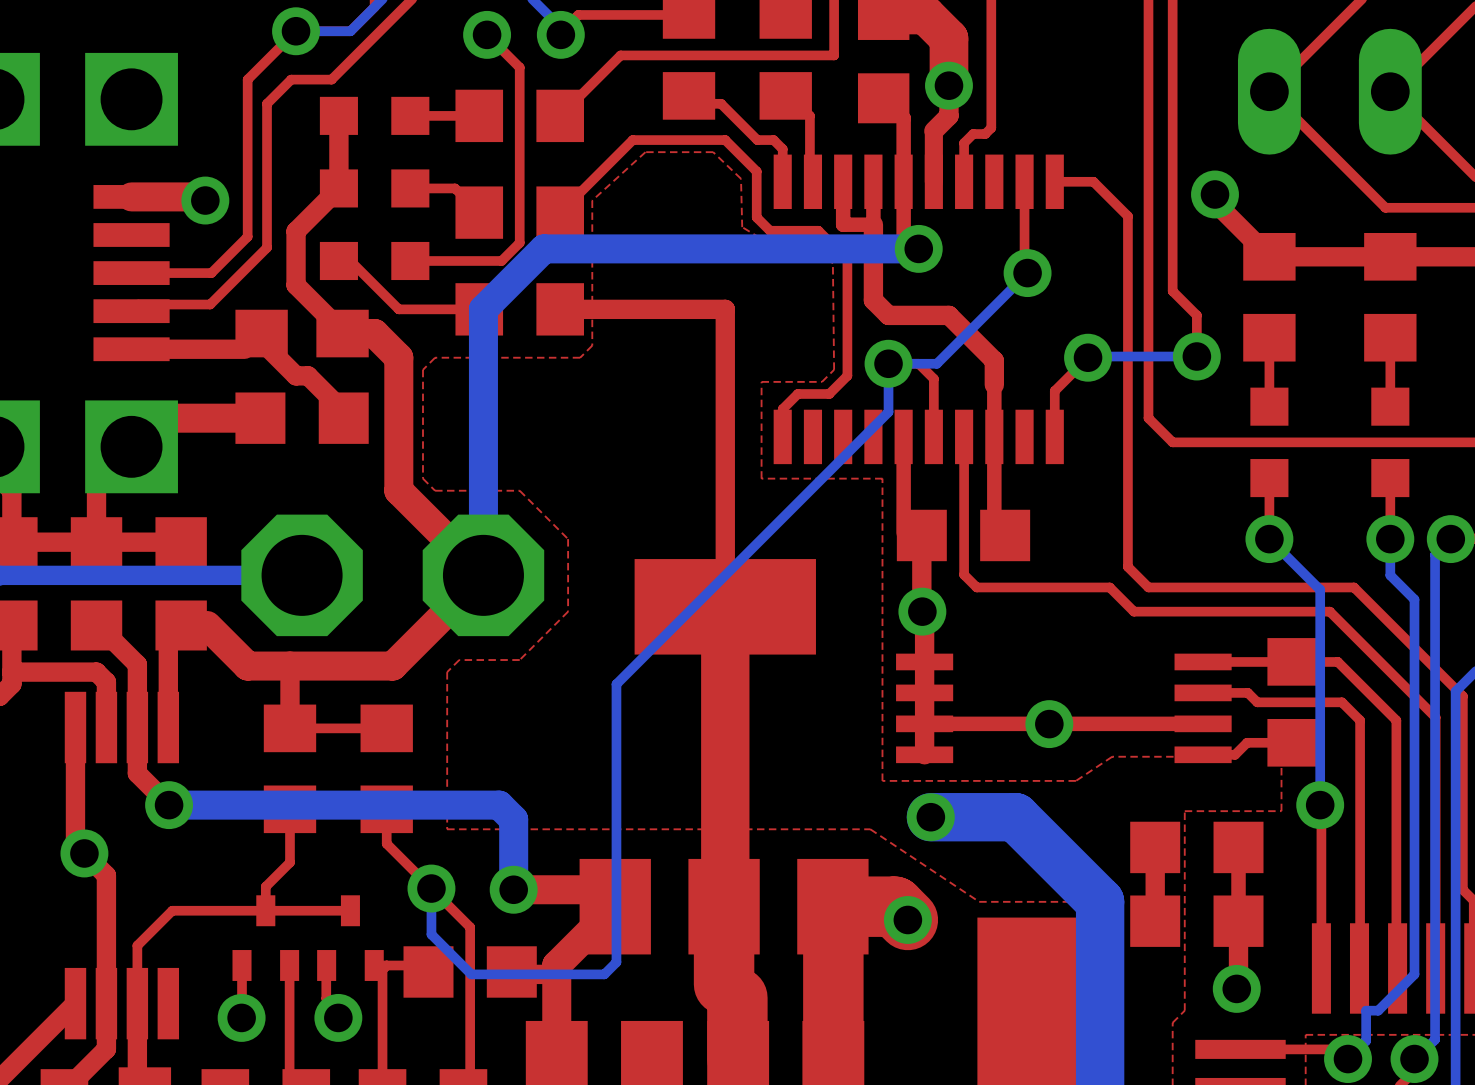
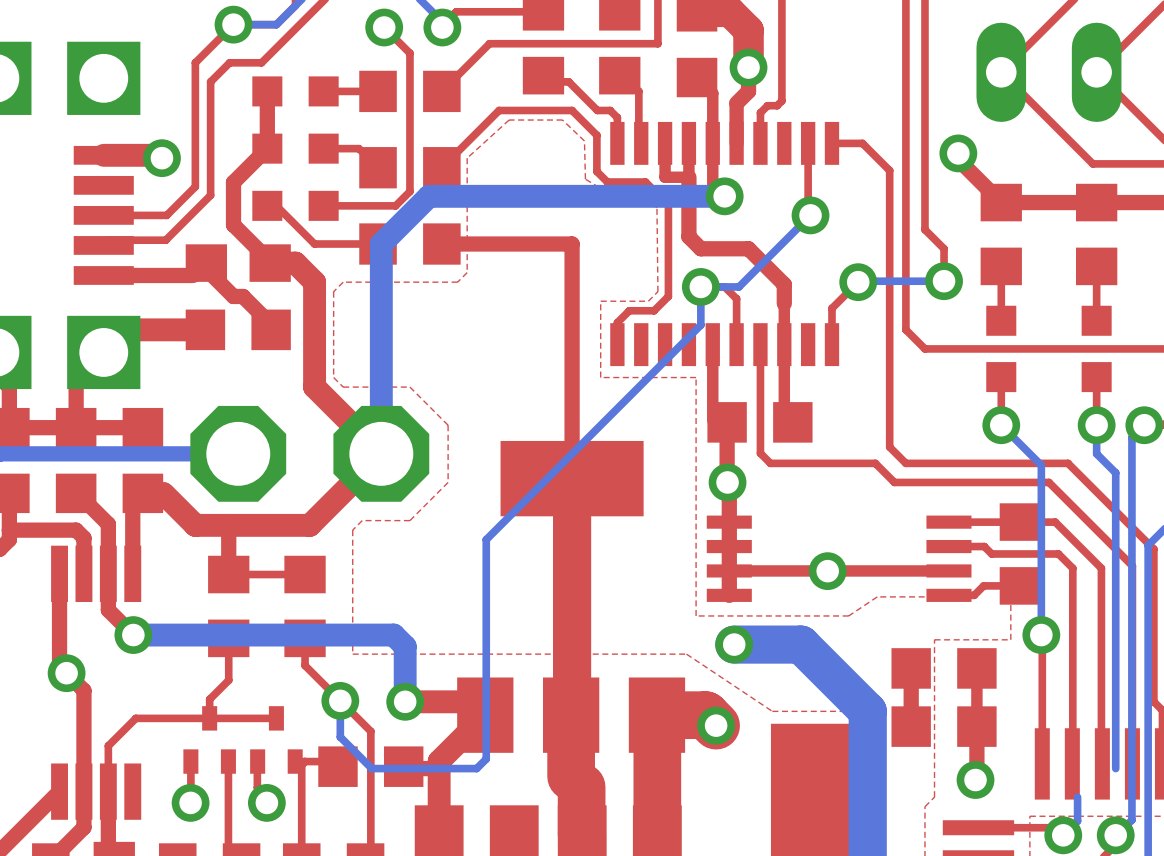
bottom track: (1414, 974) (1378, 1010) (1366, 1010) -> none

